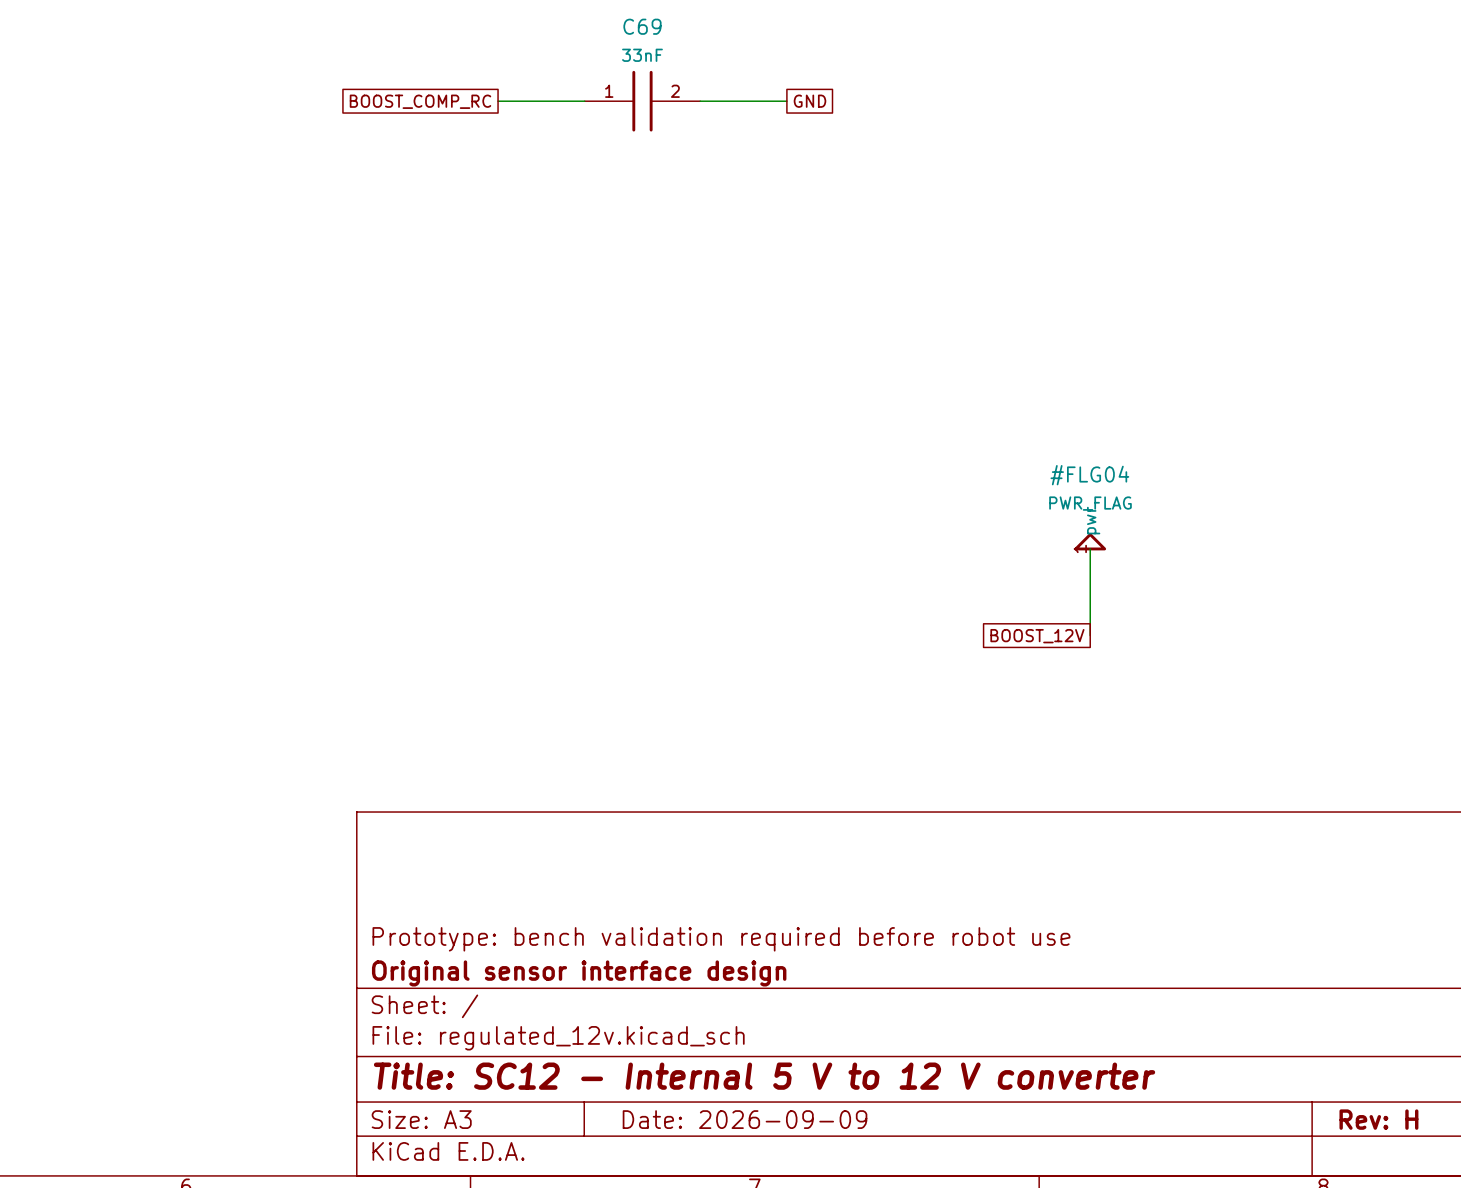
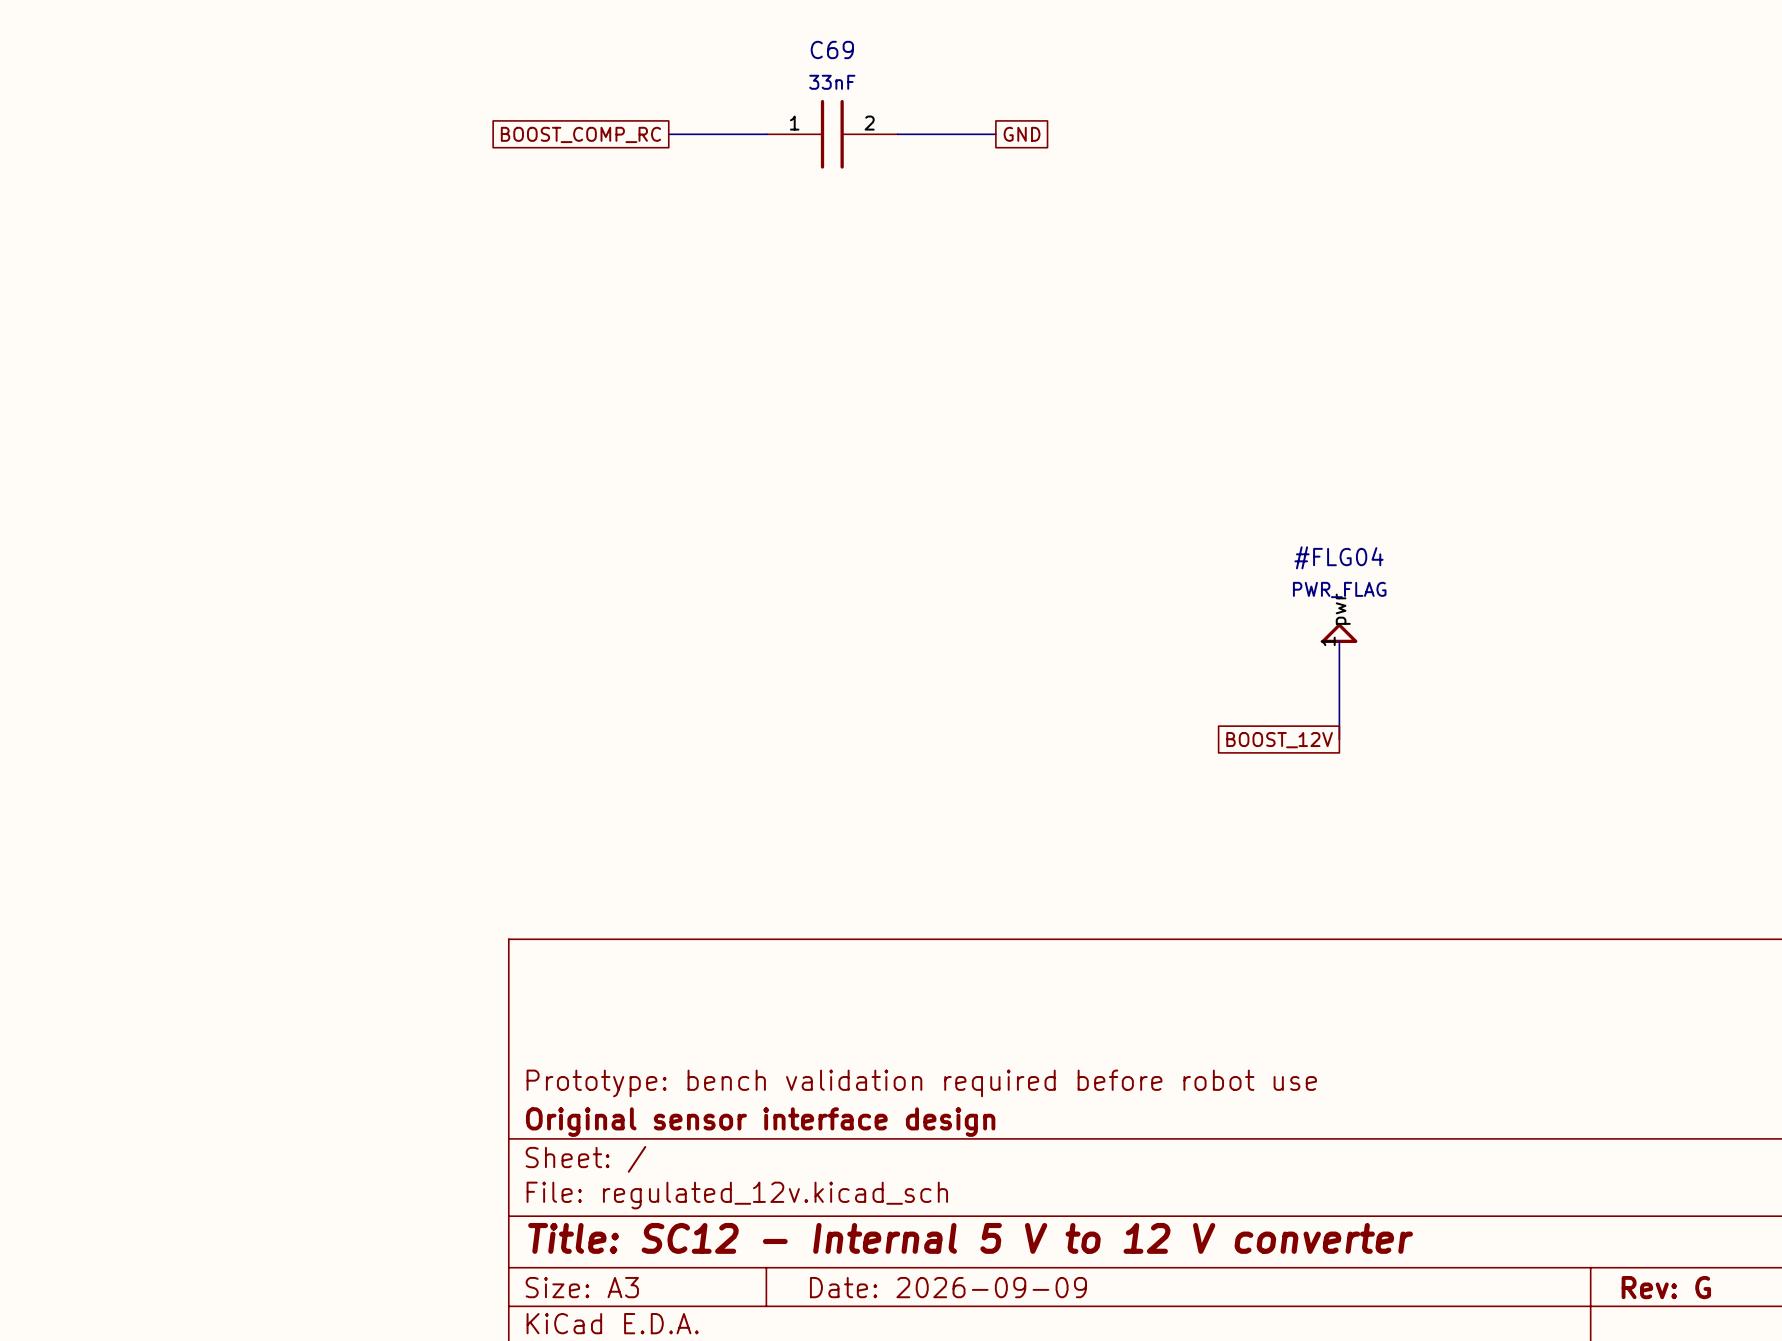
title block: Rev: H (1378, 1119) -> Rev: G (1666, 1287)

